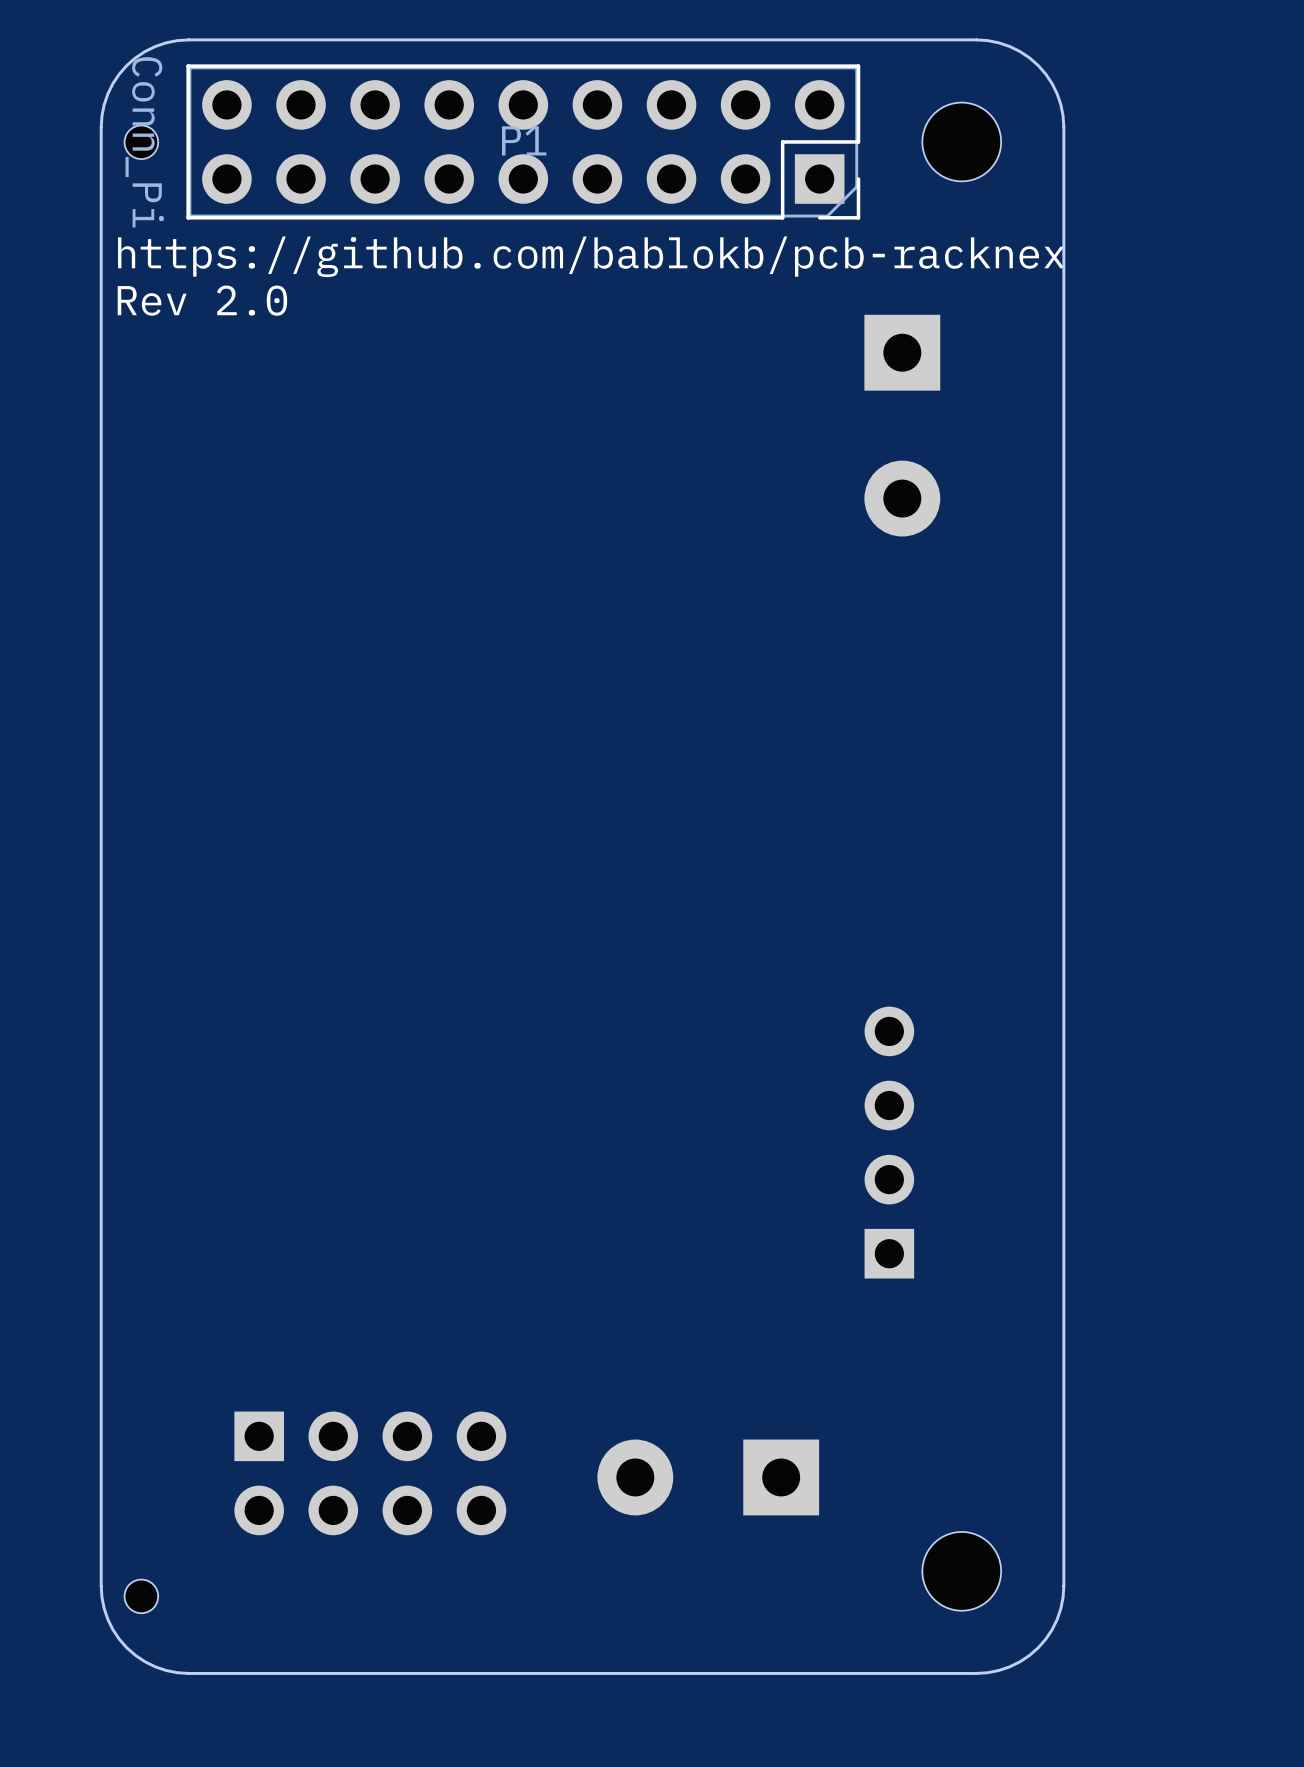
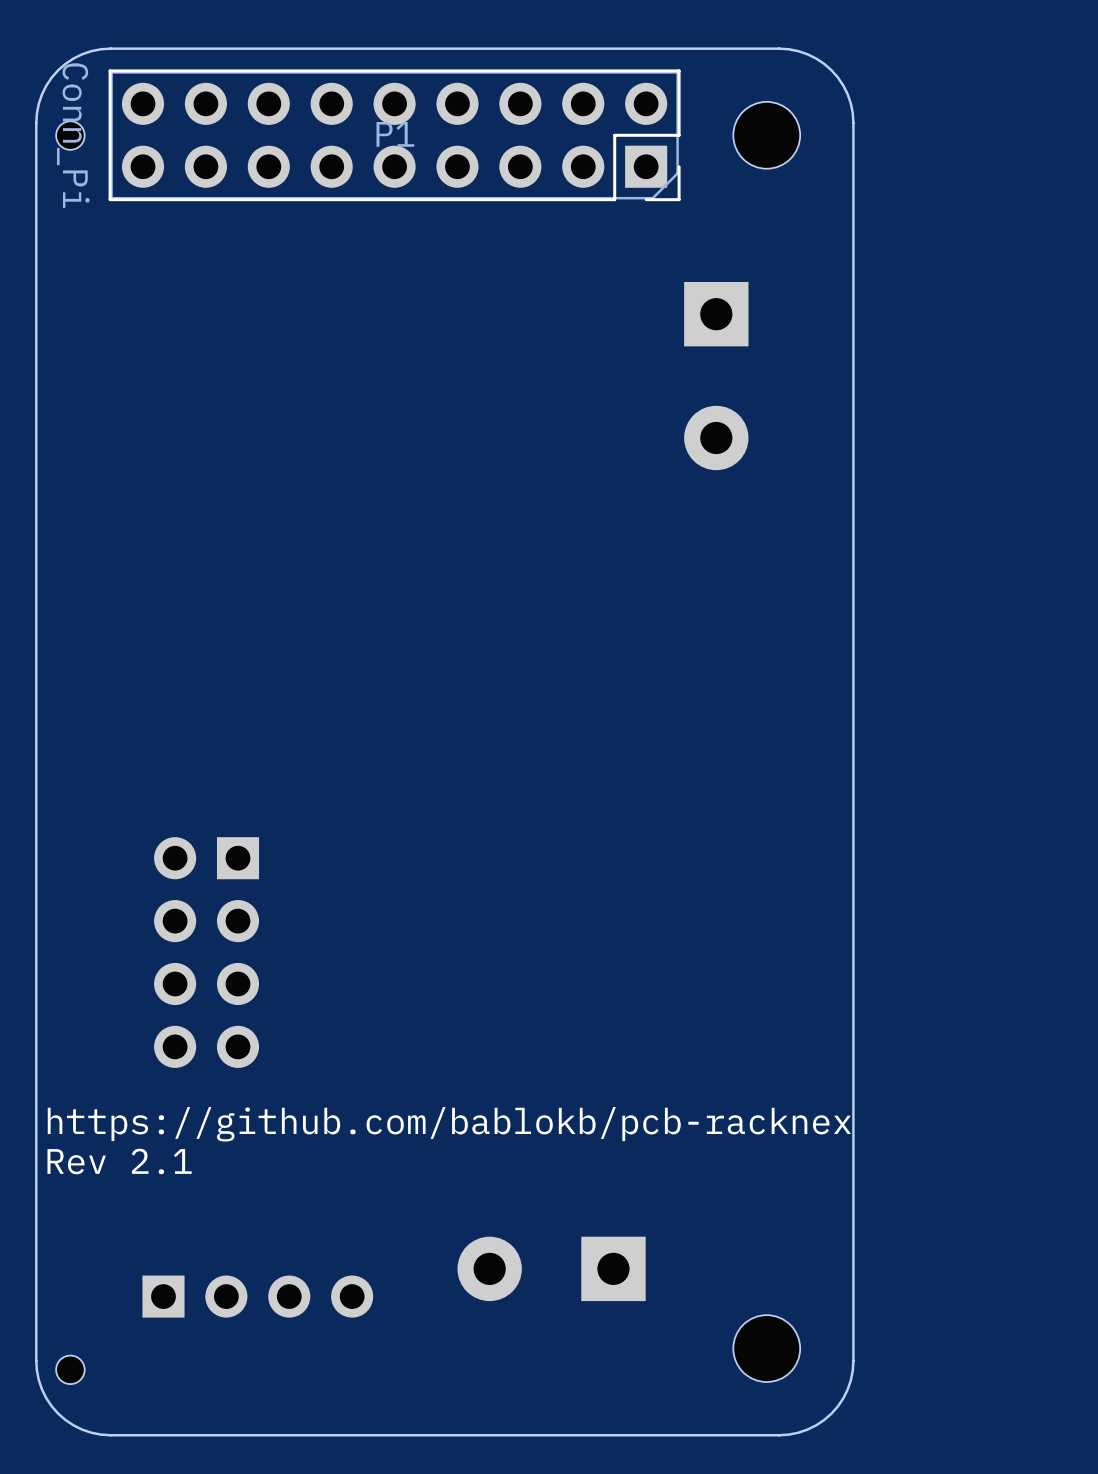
text: https://github.com/bablokb/pcb-racknex (591, 256) -> none
text: Rev 2.0 (202, 300) -> none
part rotation: 0° (889, 1142) -> 90° clockwise (257, 1296)
part position: (889, 1142) -> (257, 1296)
text: none -> https://github.com/bablokb/pcb-racknex (449, 1124)
text: none -> Rev 2.1 (119, 1161)
part rotation: 0° (370, 1473) -> 90° clockwise (206, 952)
part position: (370, 1473) -> (206, 952)

